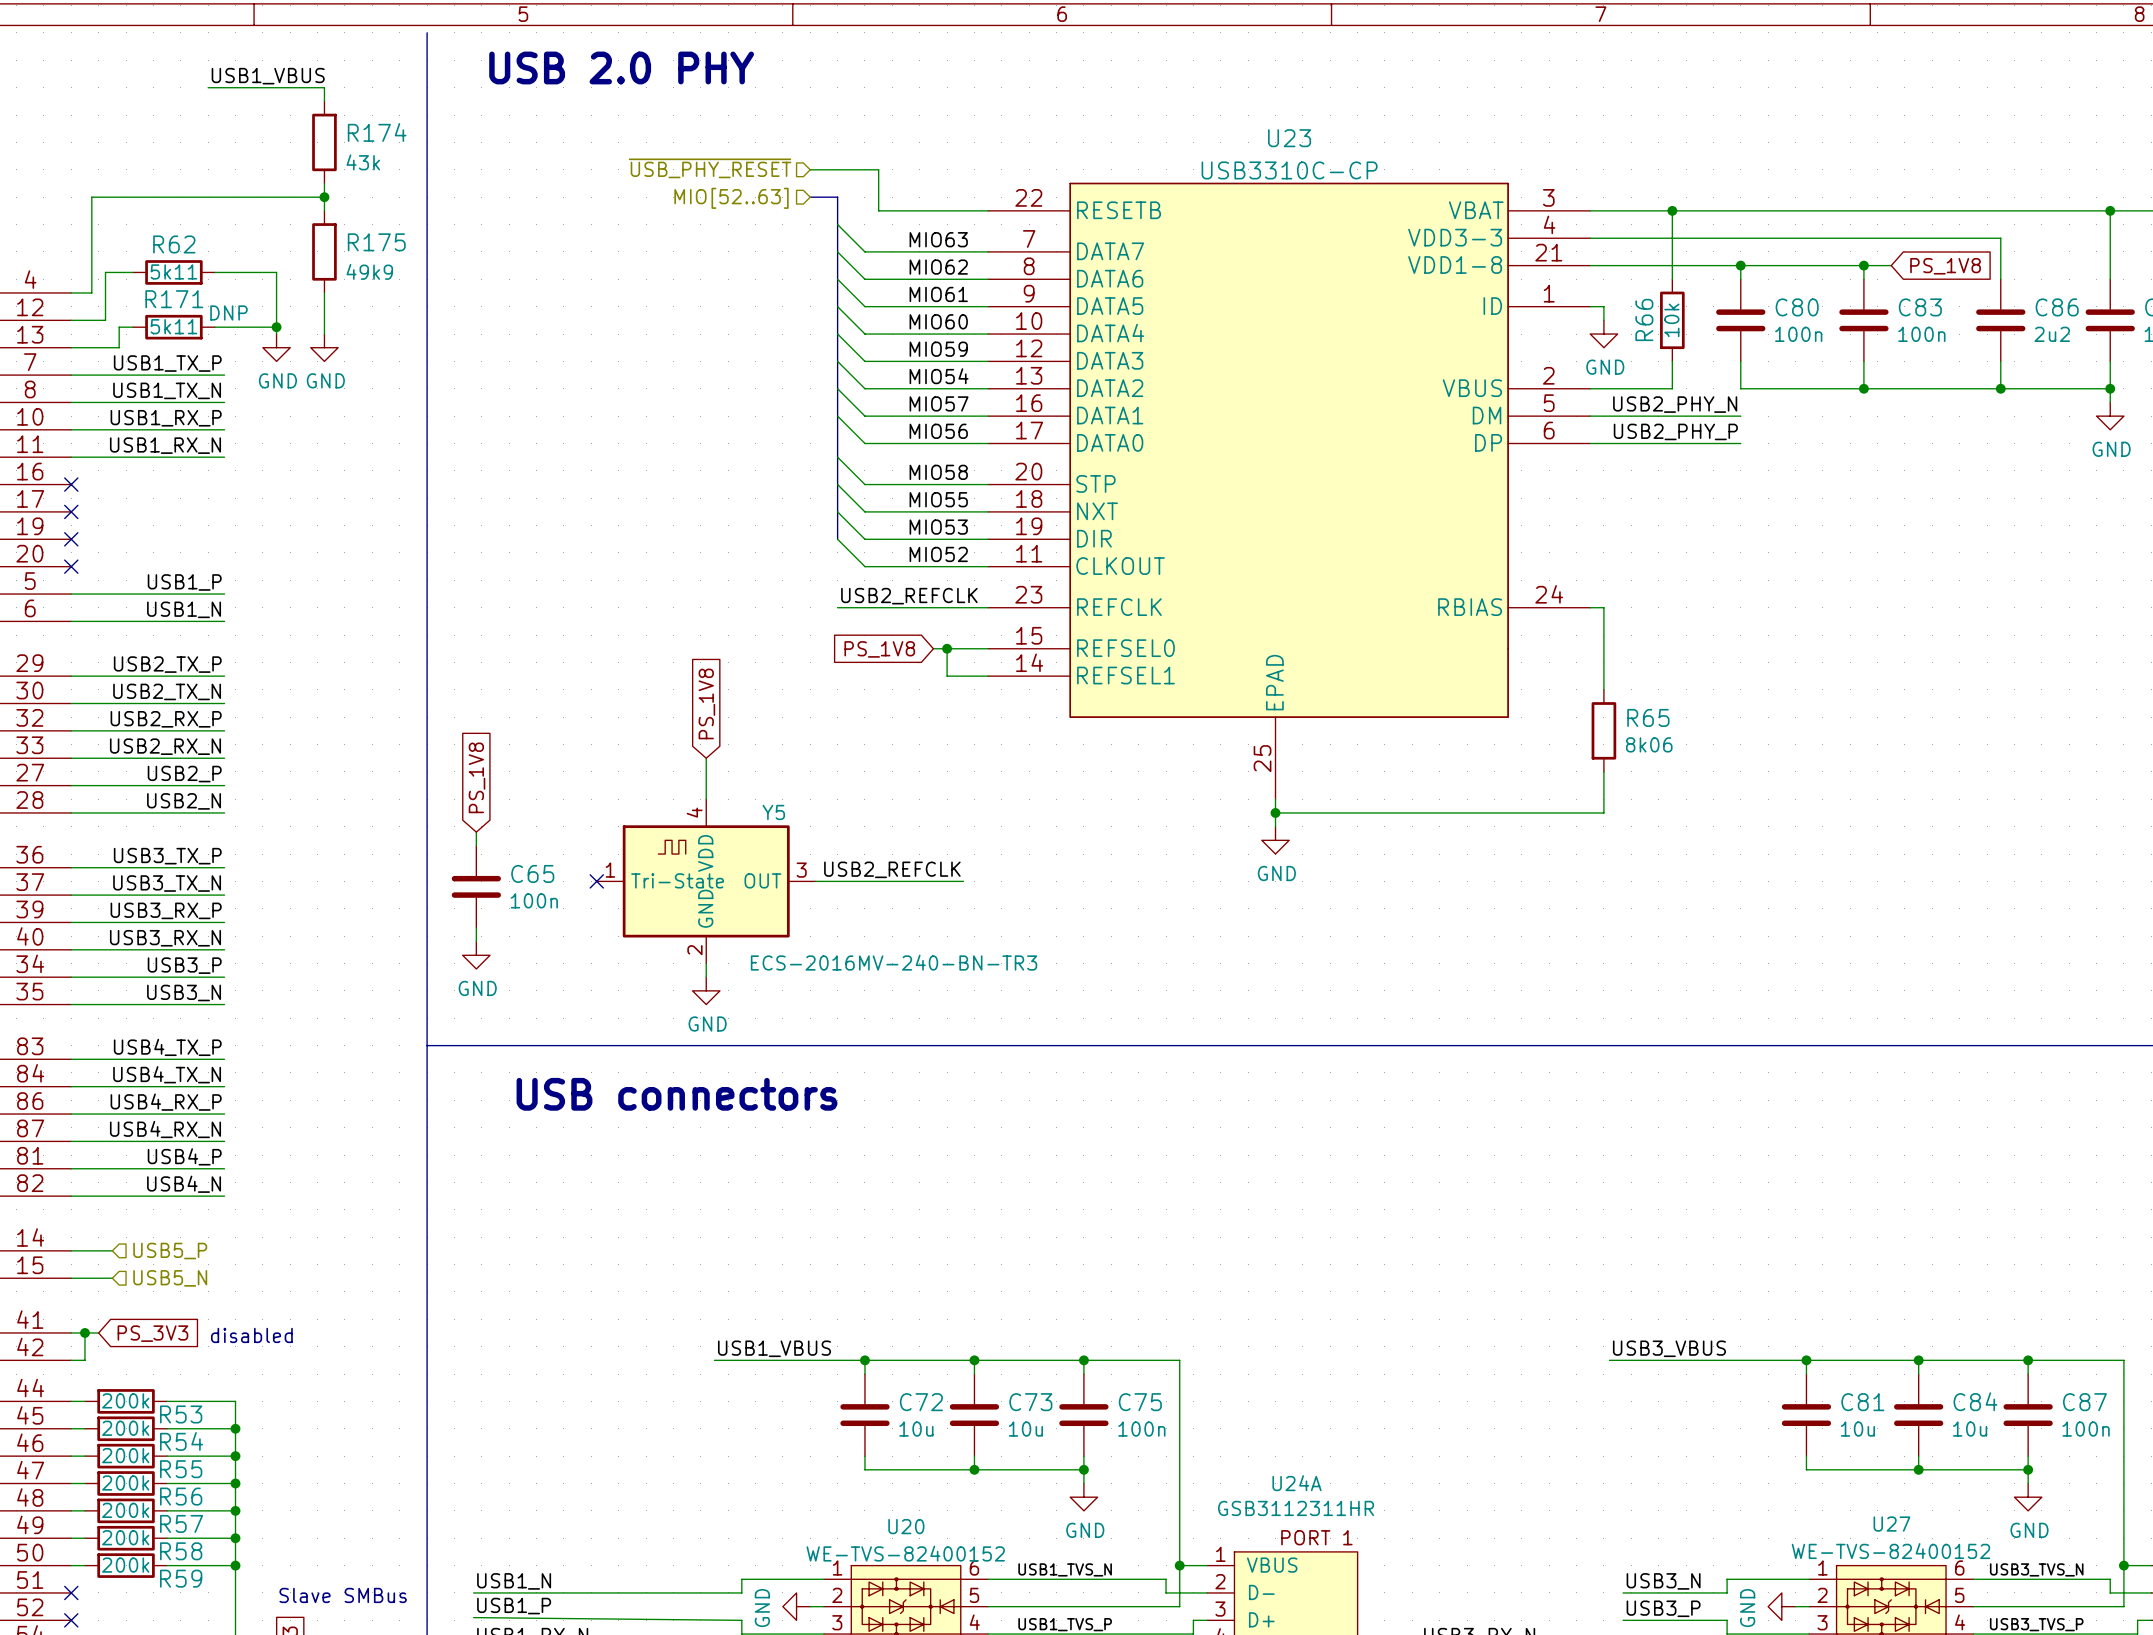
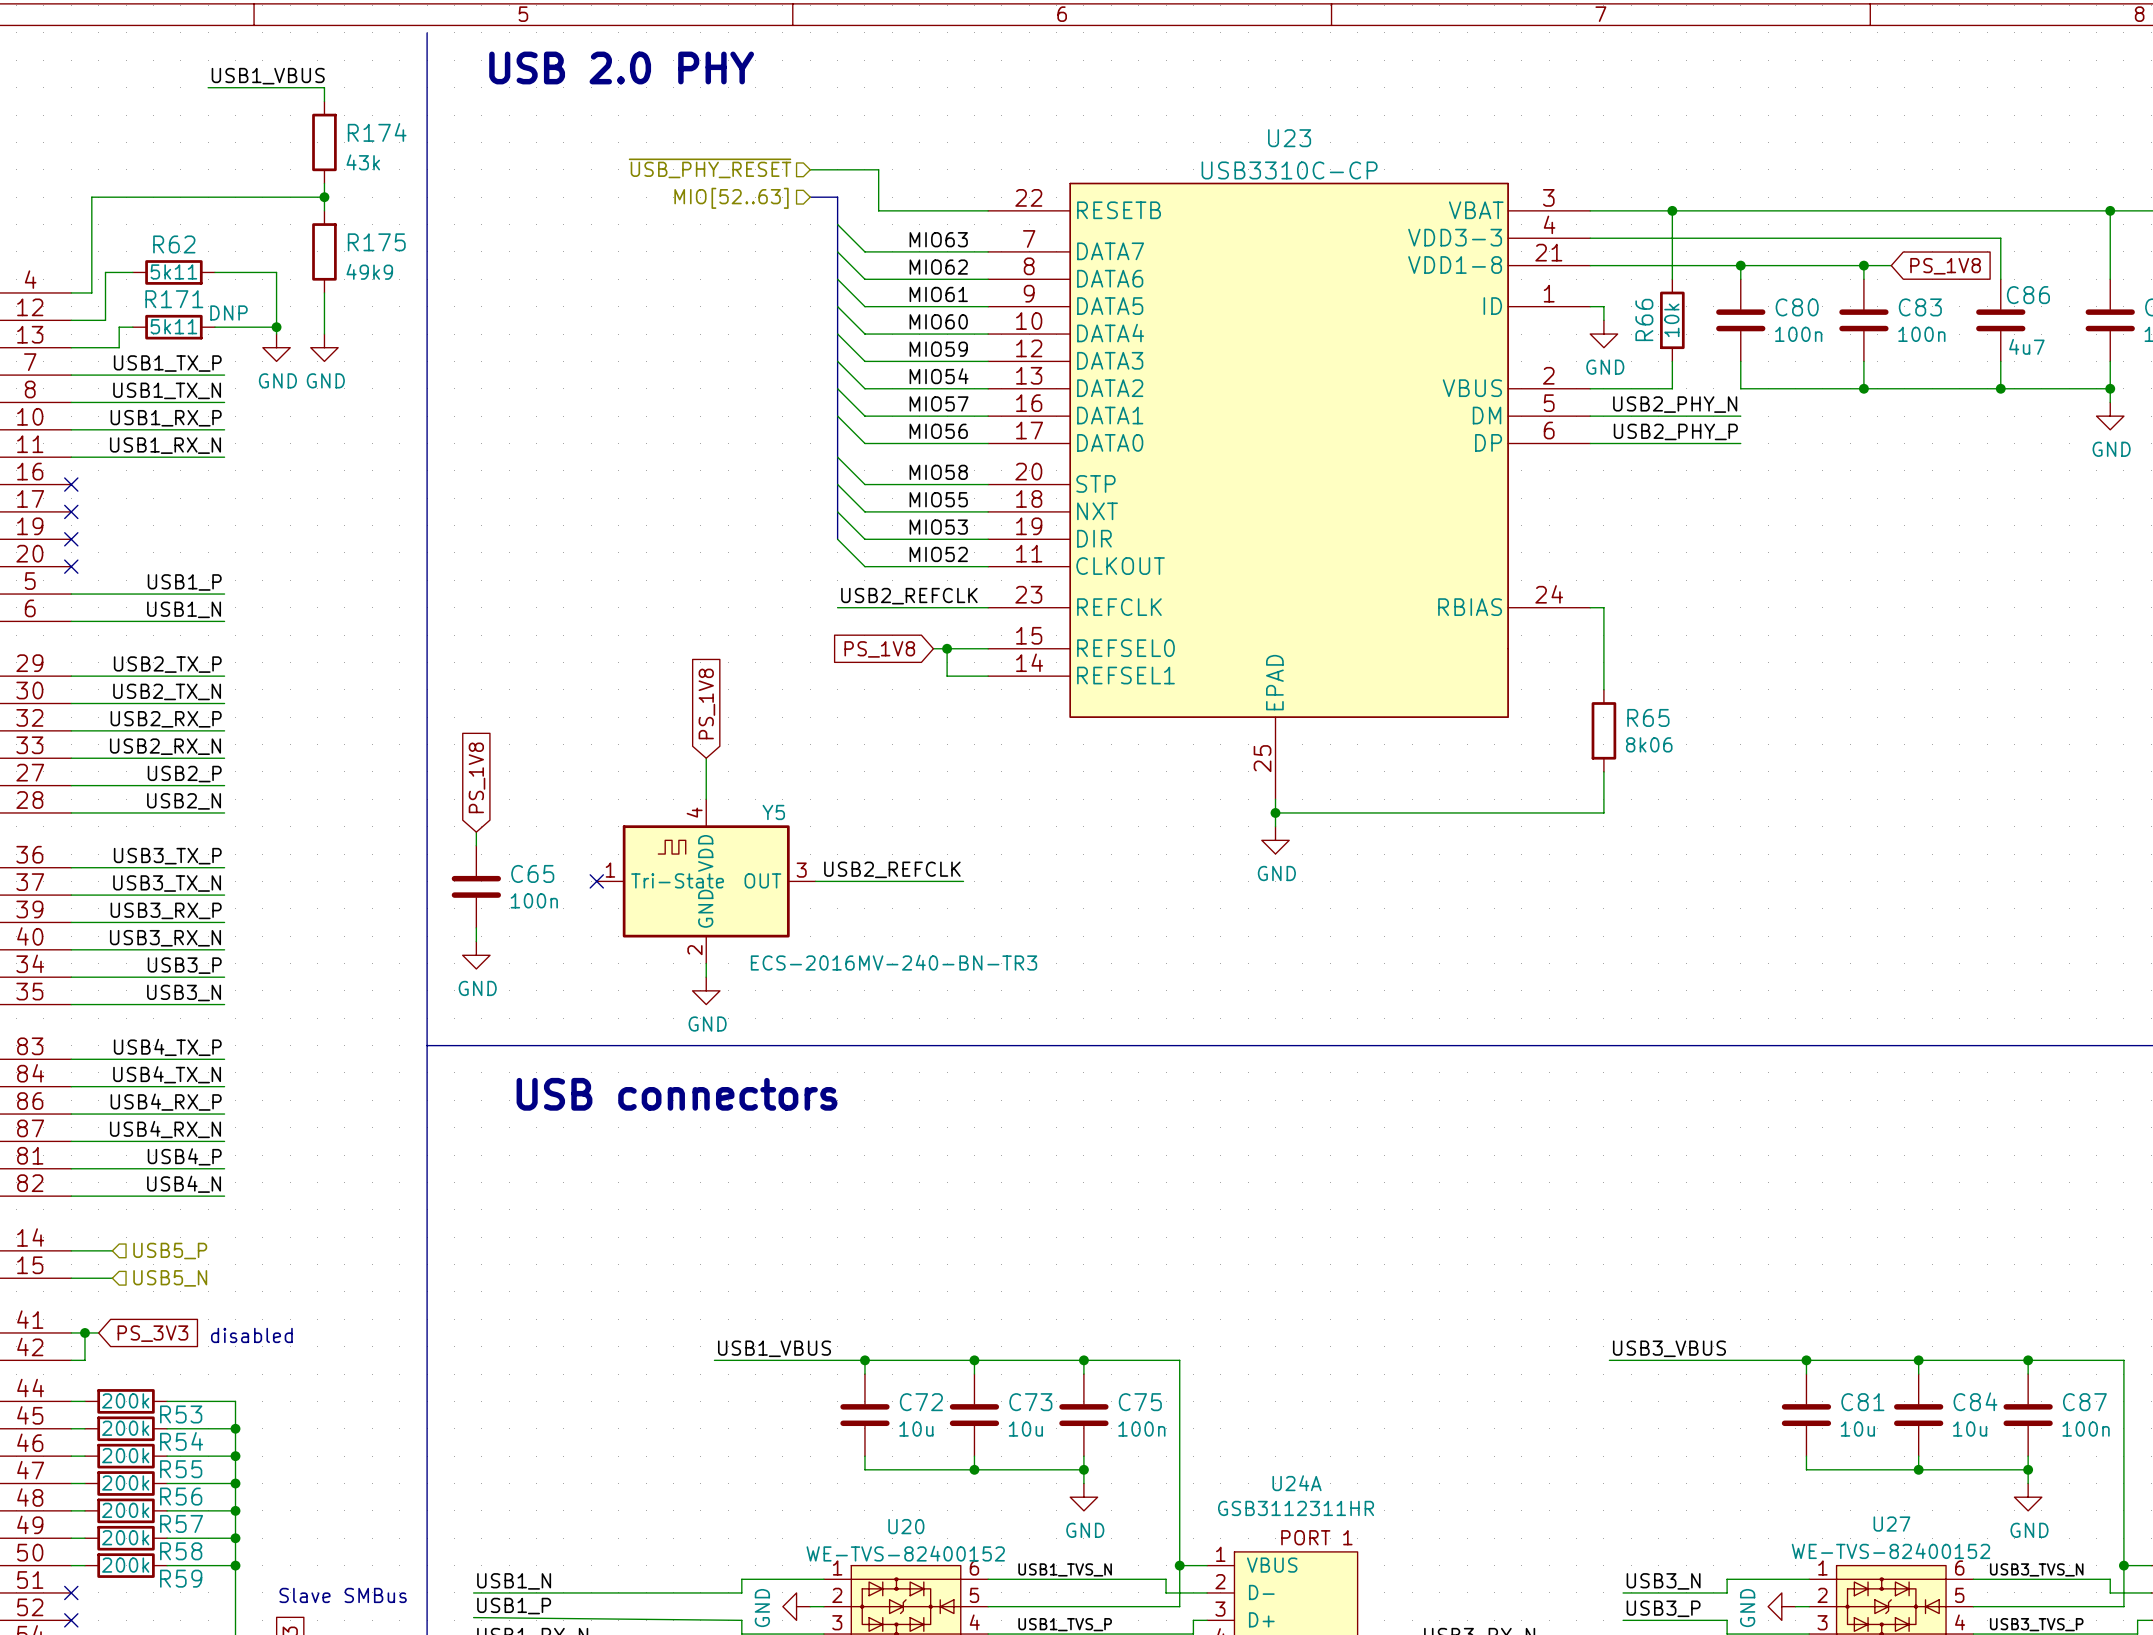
C86 name position: C86 (2057, 307) -> C86 (2028, 295)
C86 text: 2u2 (2052, 334) -> 4u7 (2026, 346)

